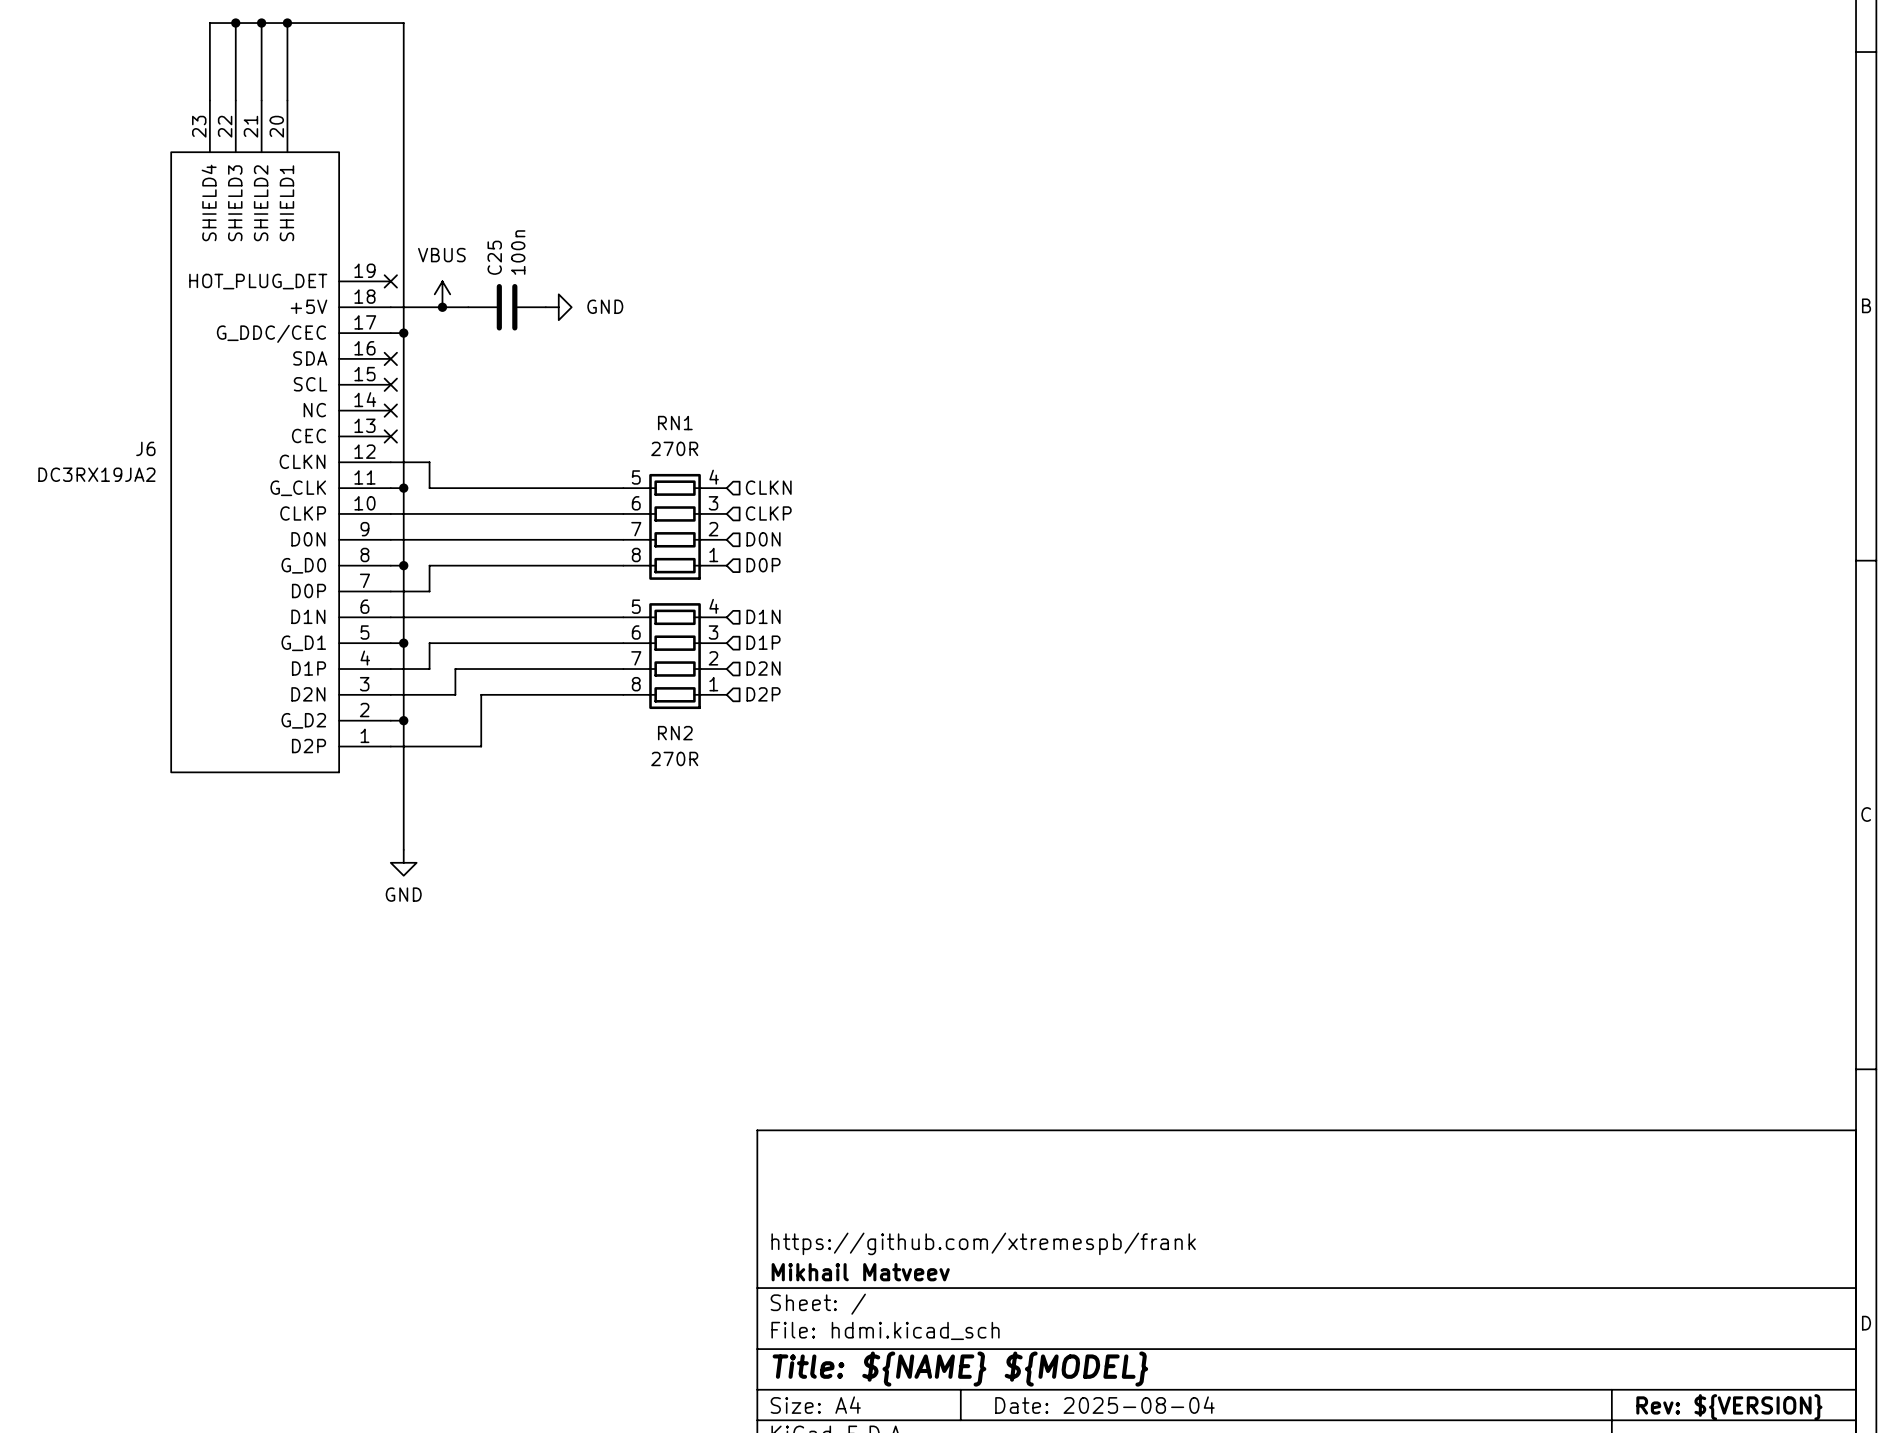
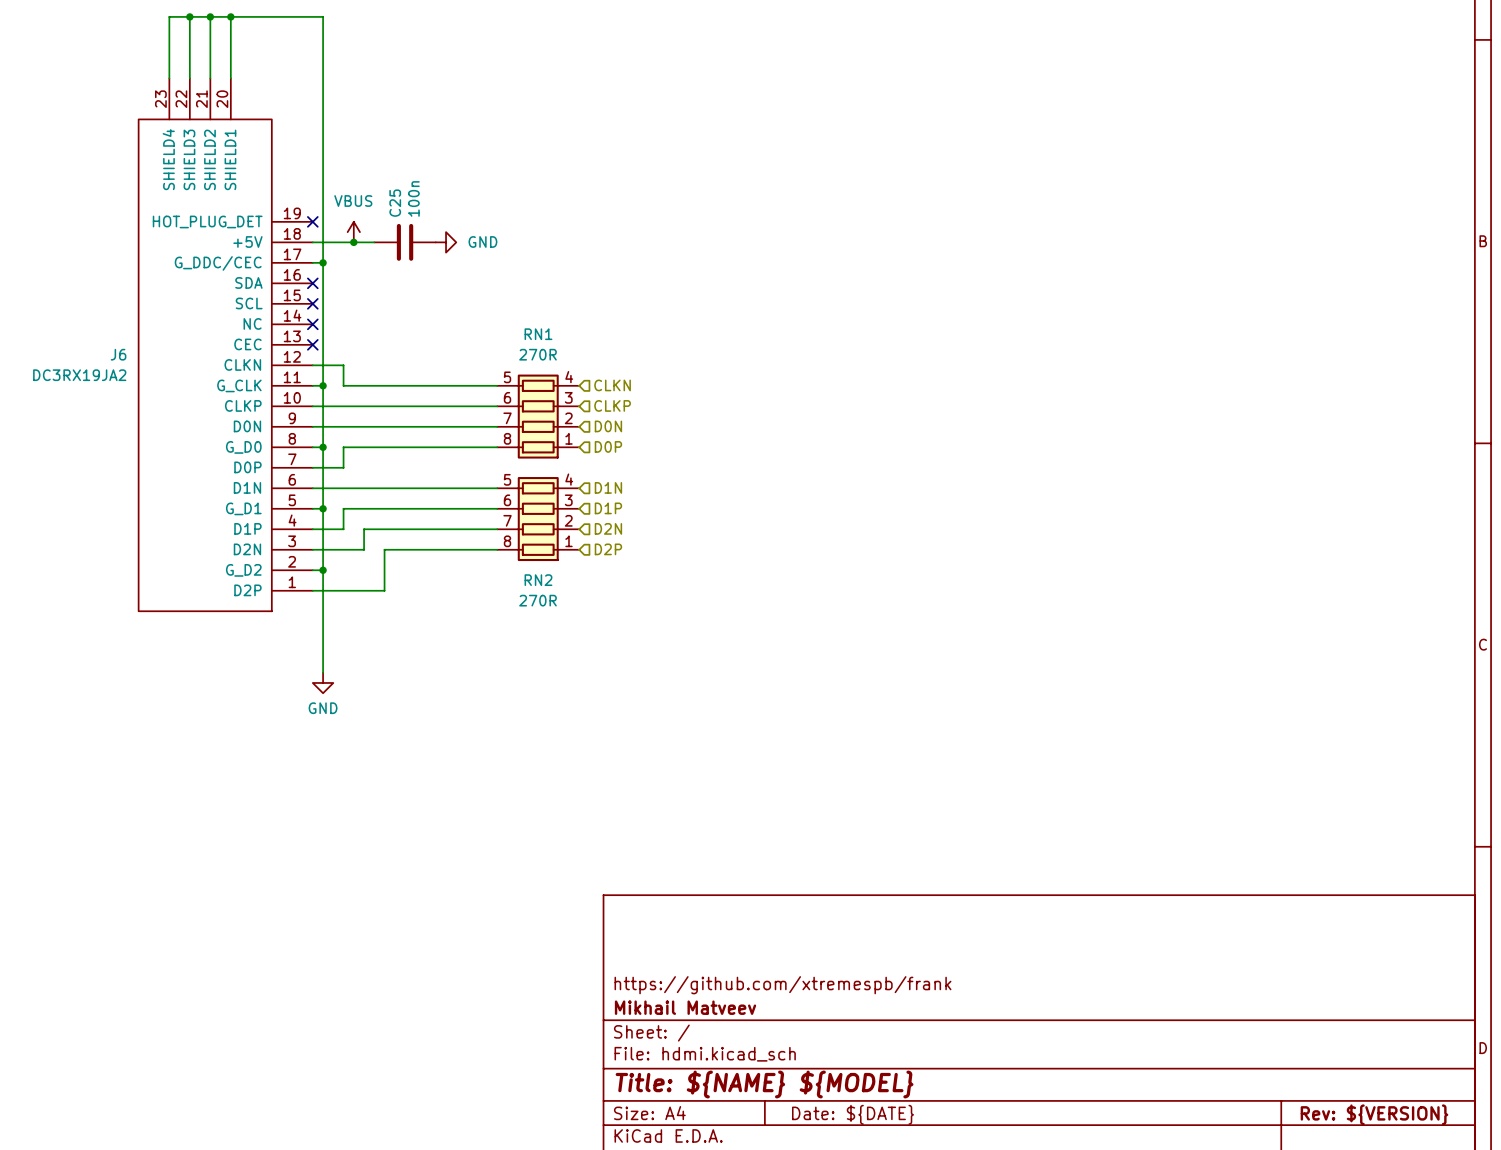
title block: Date: 2025-08-04 (1104, 1405) -> Date: ${DATE} (853, 1114)

